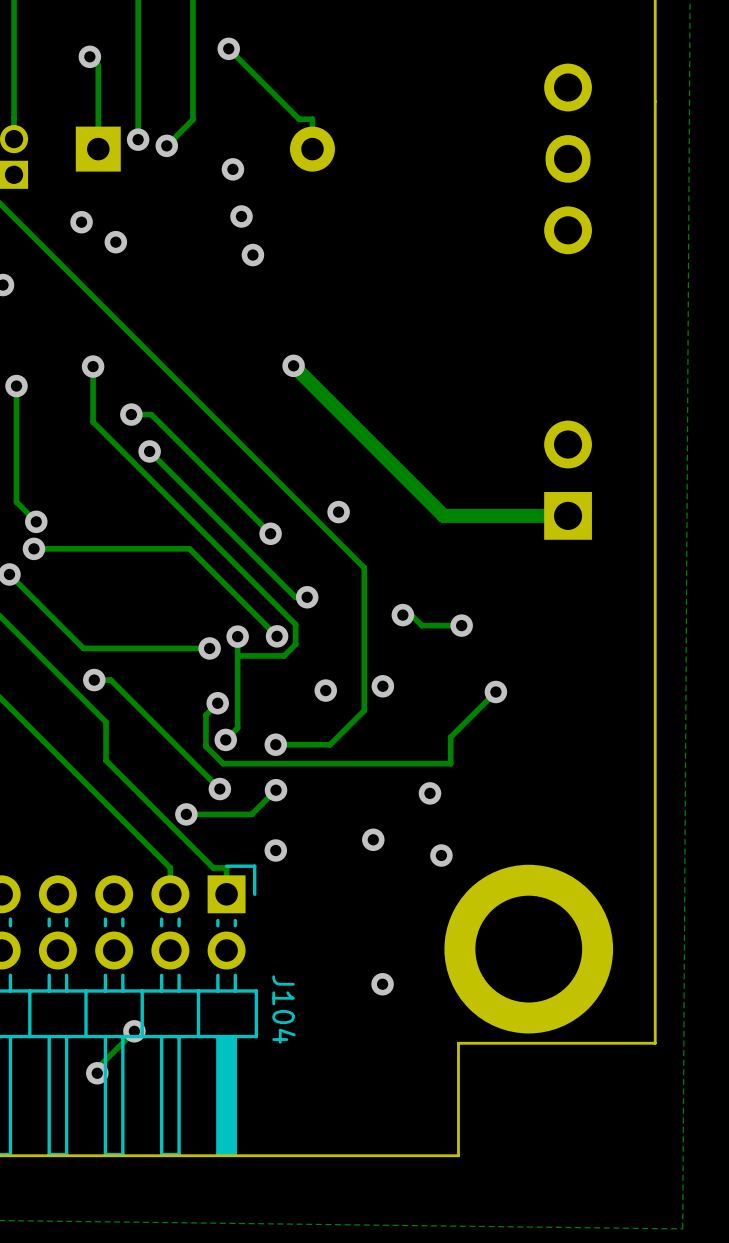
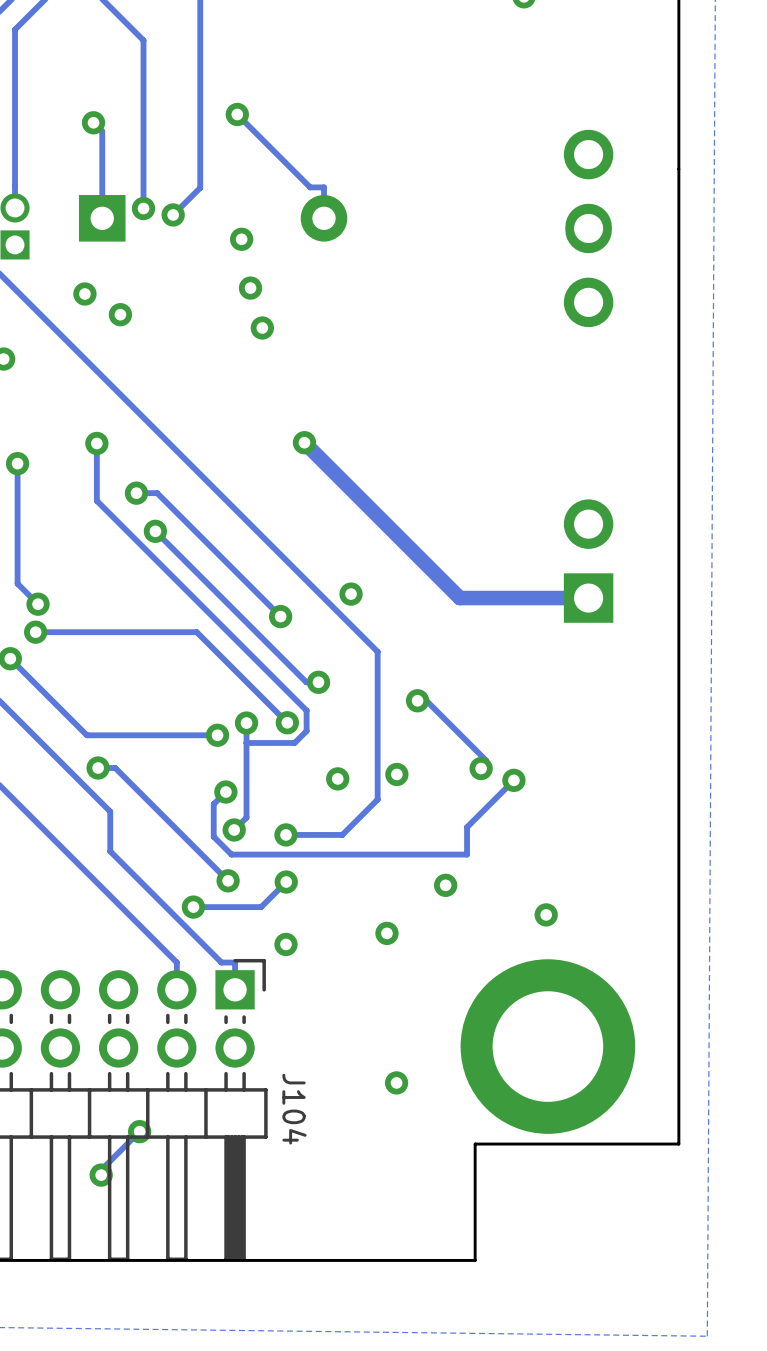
track: (461, 625) (421, 625) -> (481, 768) (486, 763) (486, 760) (437, 711)
via position: (461, 625) -> (481, 768)
via: none -> (546, 914)
via: (441, 855) -> none

